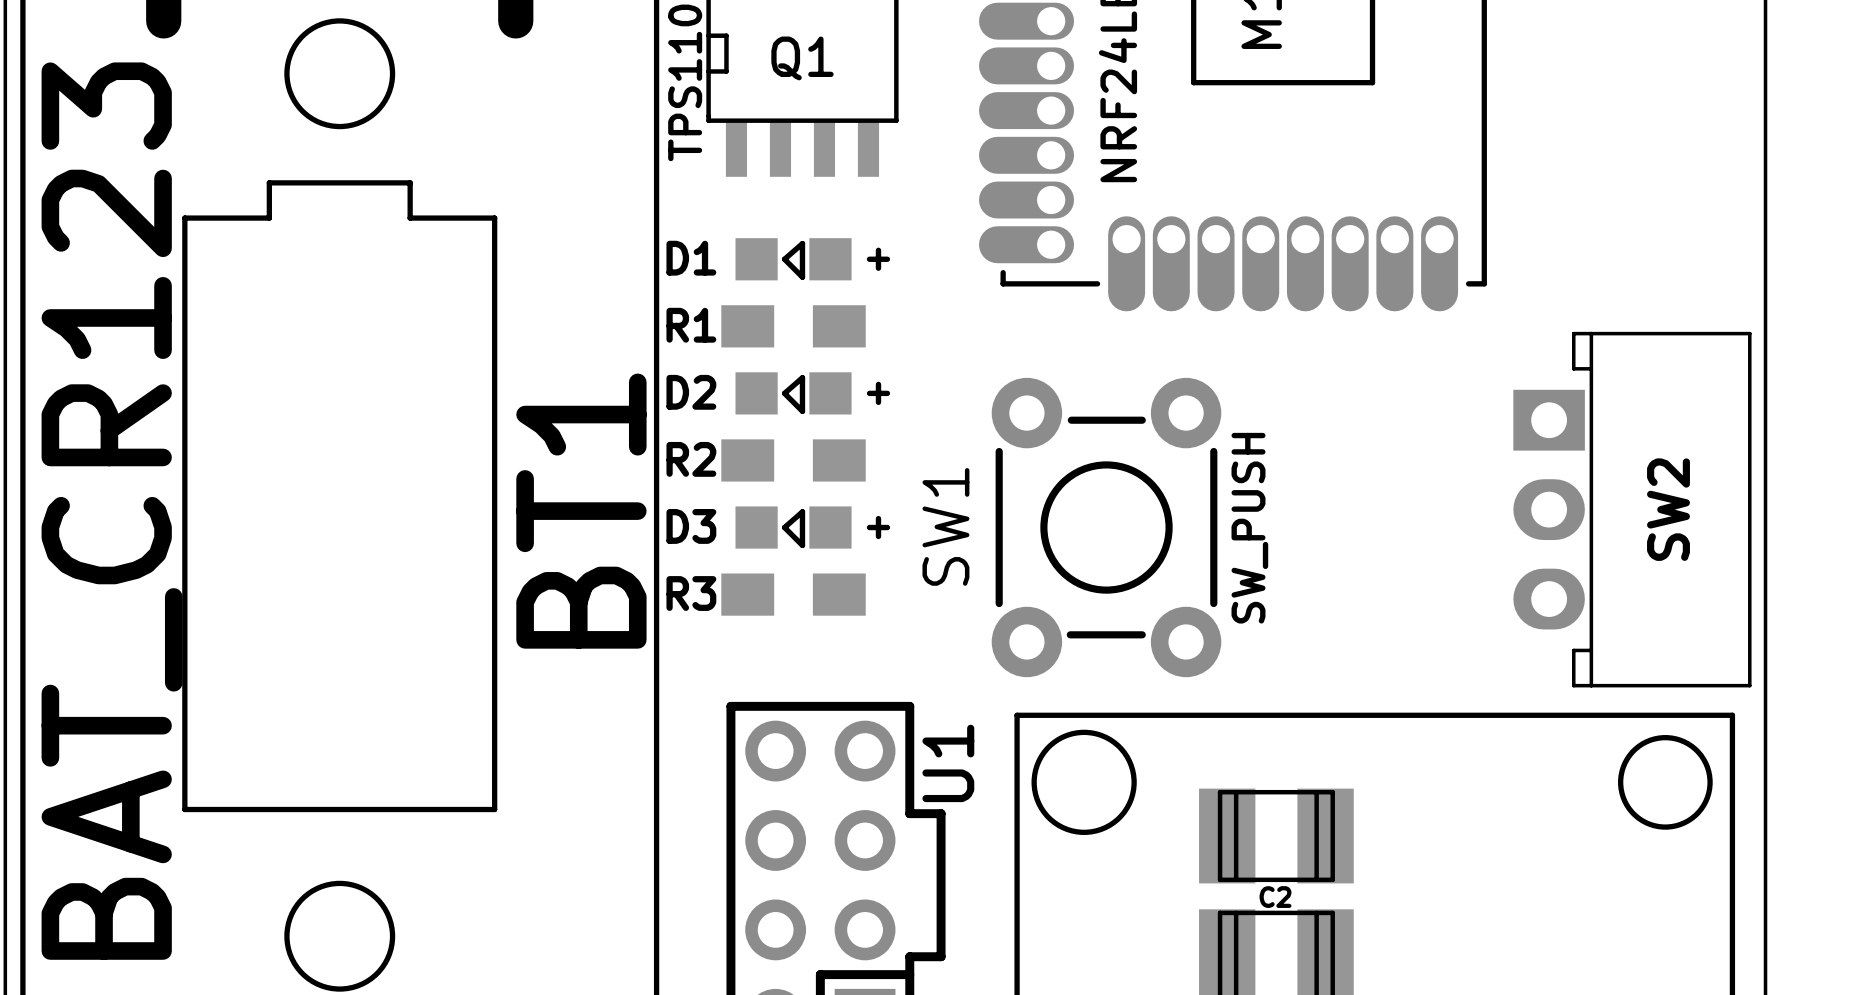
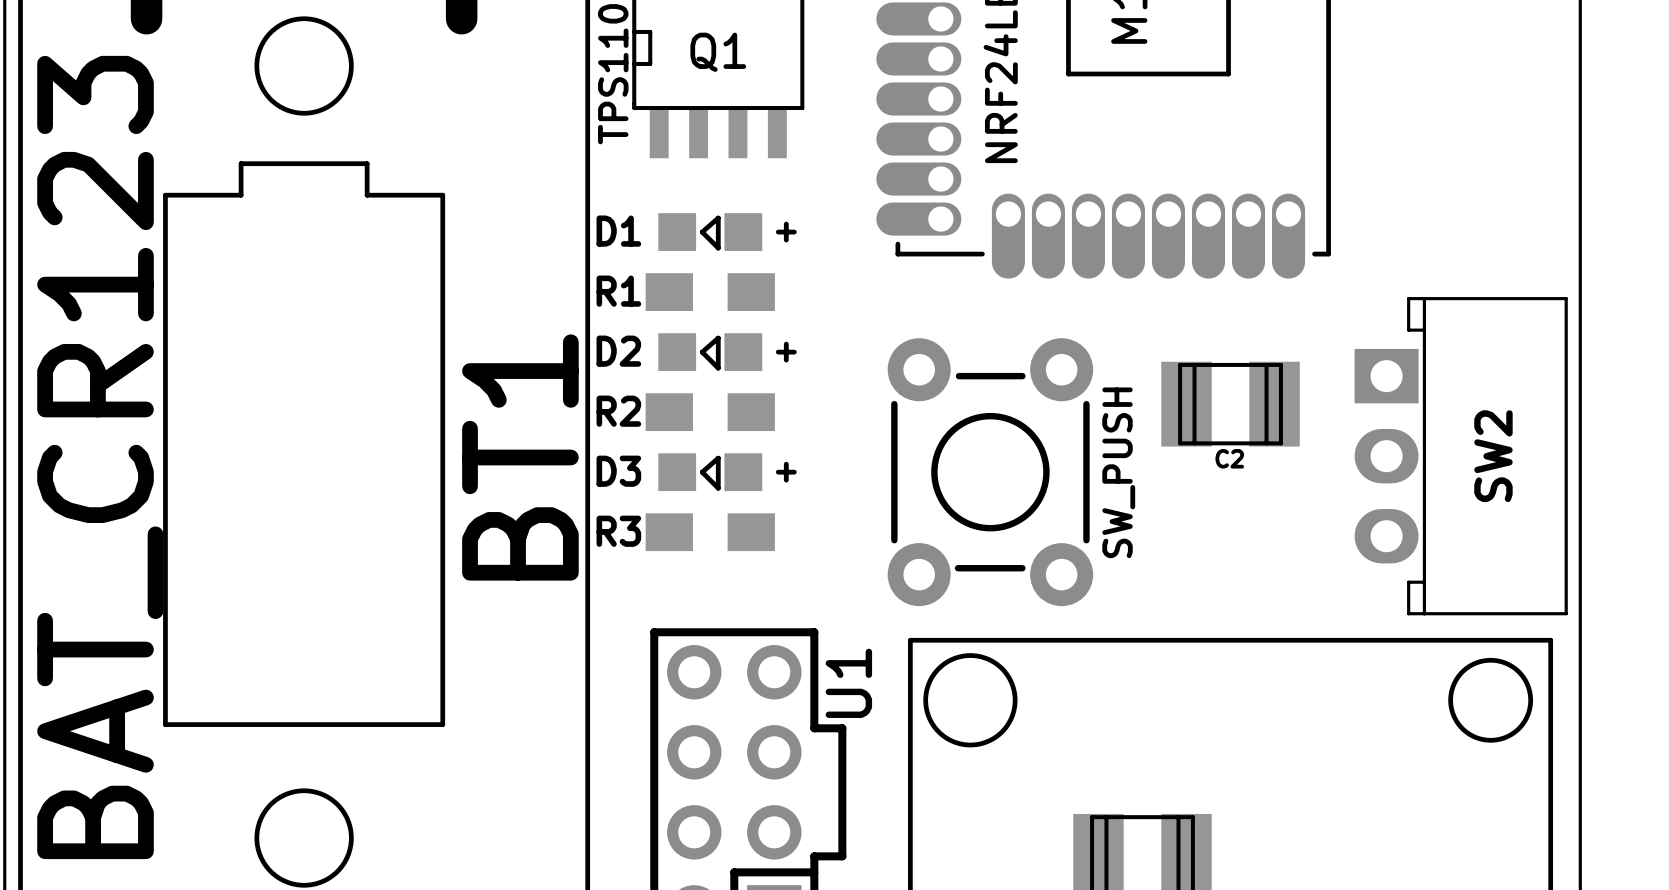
SW1 name: SW1 (945, 526) -> none
C2 position: (1276, 836) -> (1230, 404)

